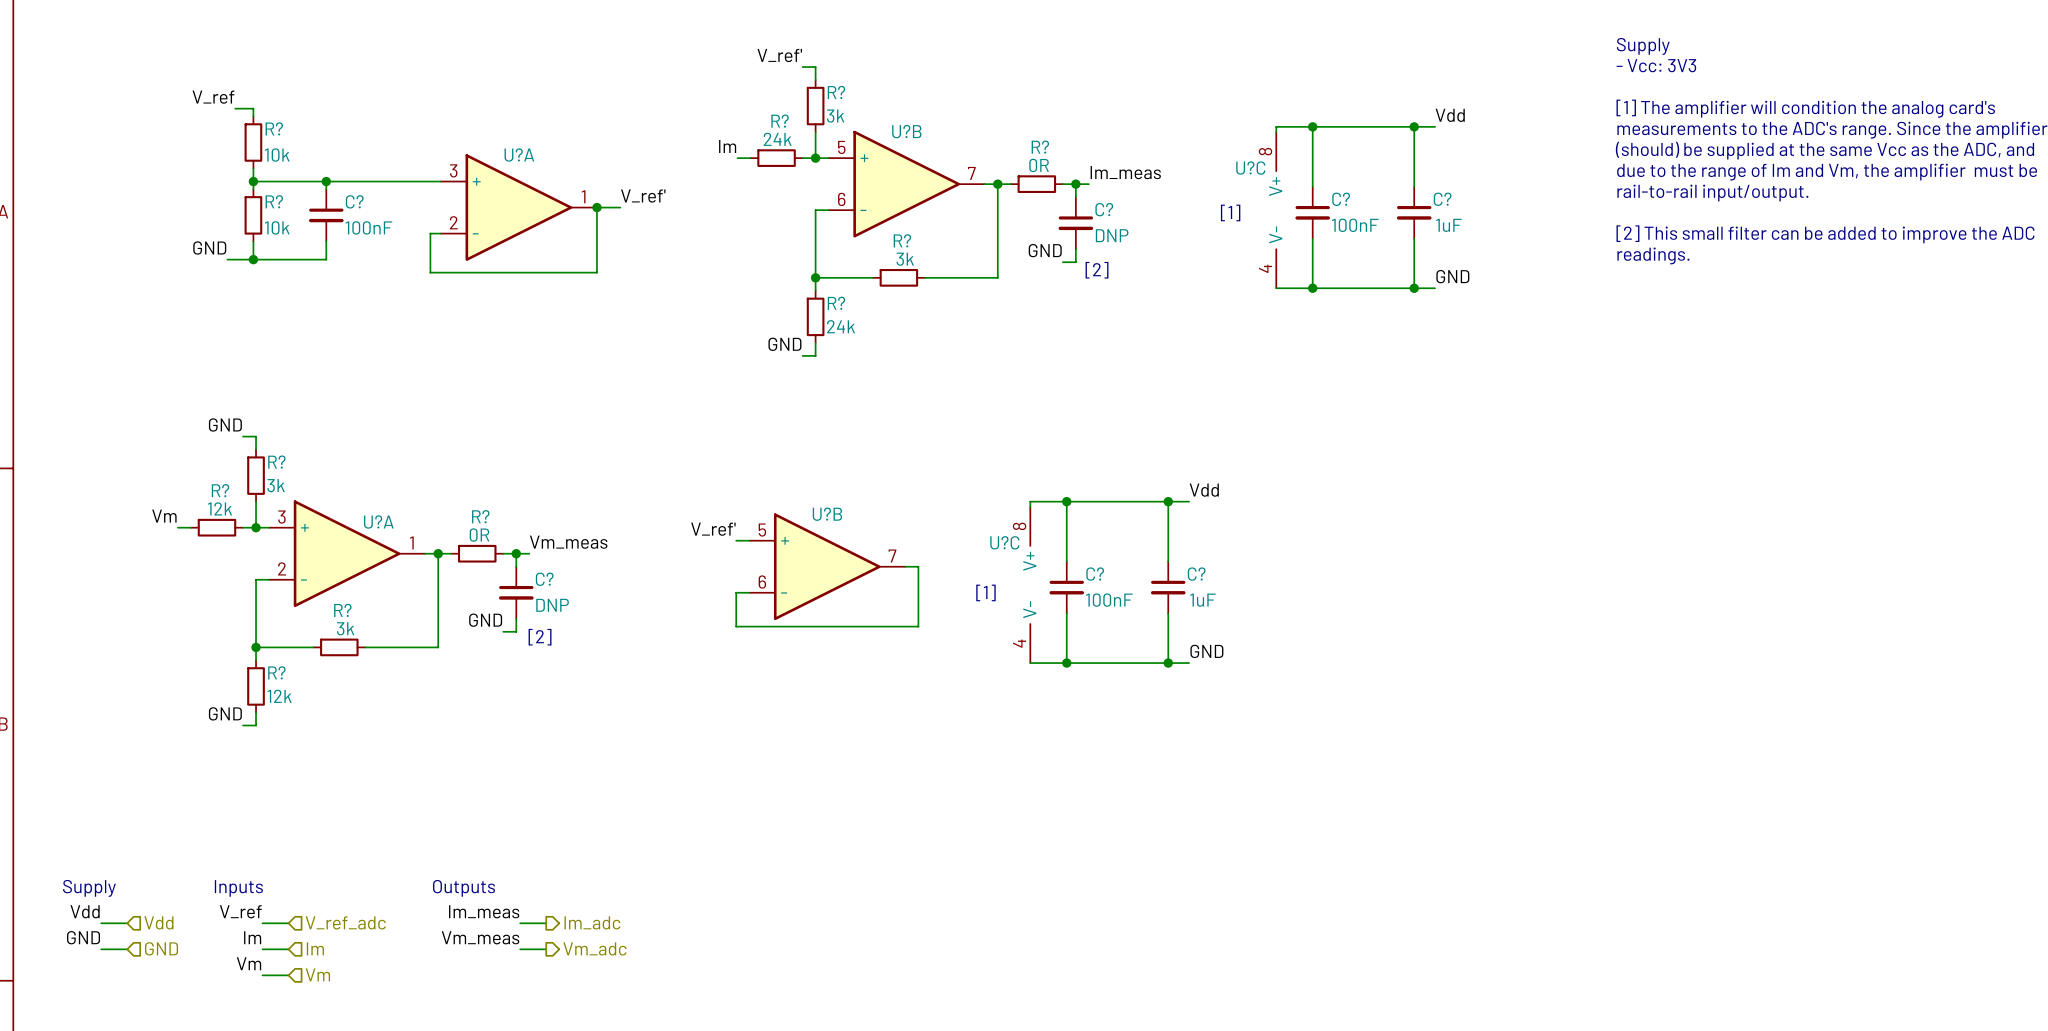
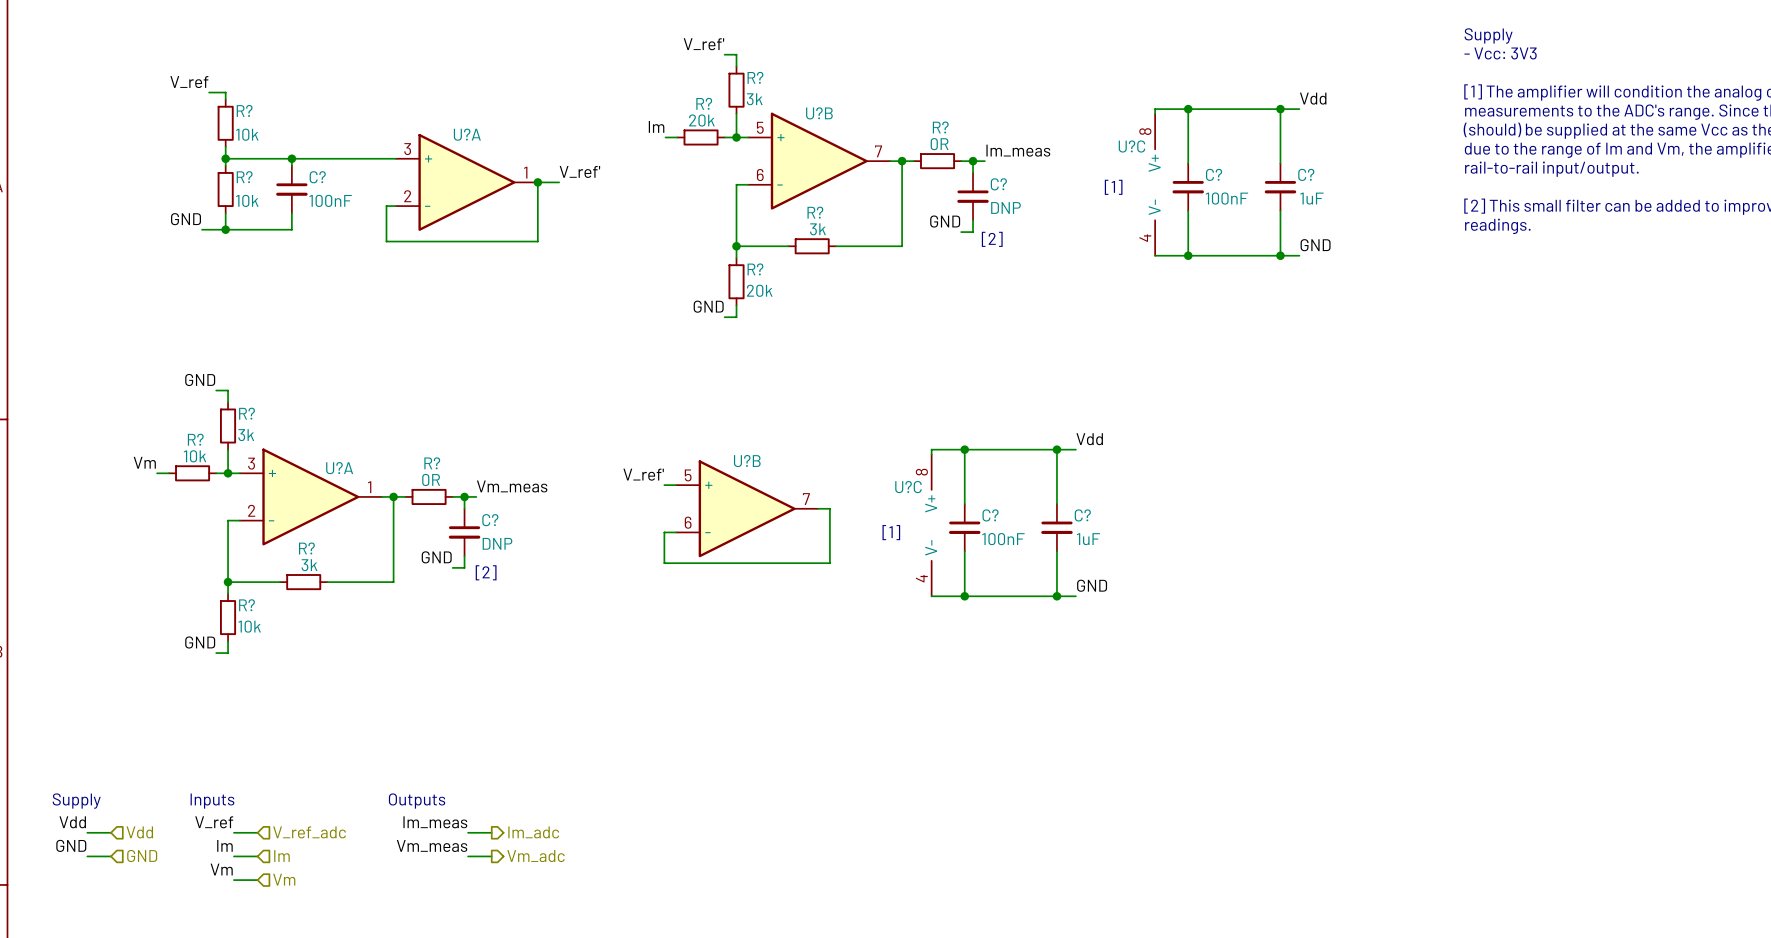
R? value: 24k (777, 139) -> 20k (701, 120)
R? value: 24k (841, 326) -> 20k (759, 290)
R? value: 12k (219, 508) -> 10k (195, 456)
R? value: 12k (279, 696) -> 10k (249, 626)

